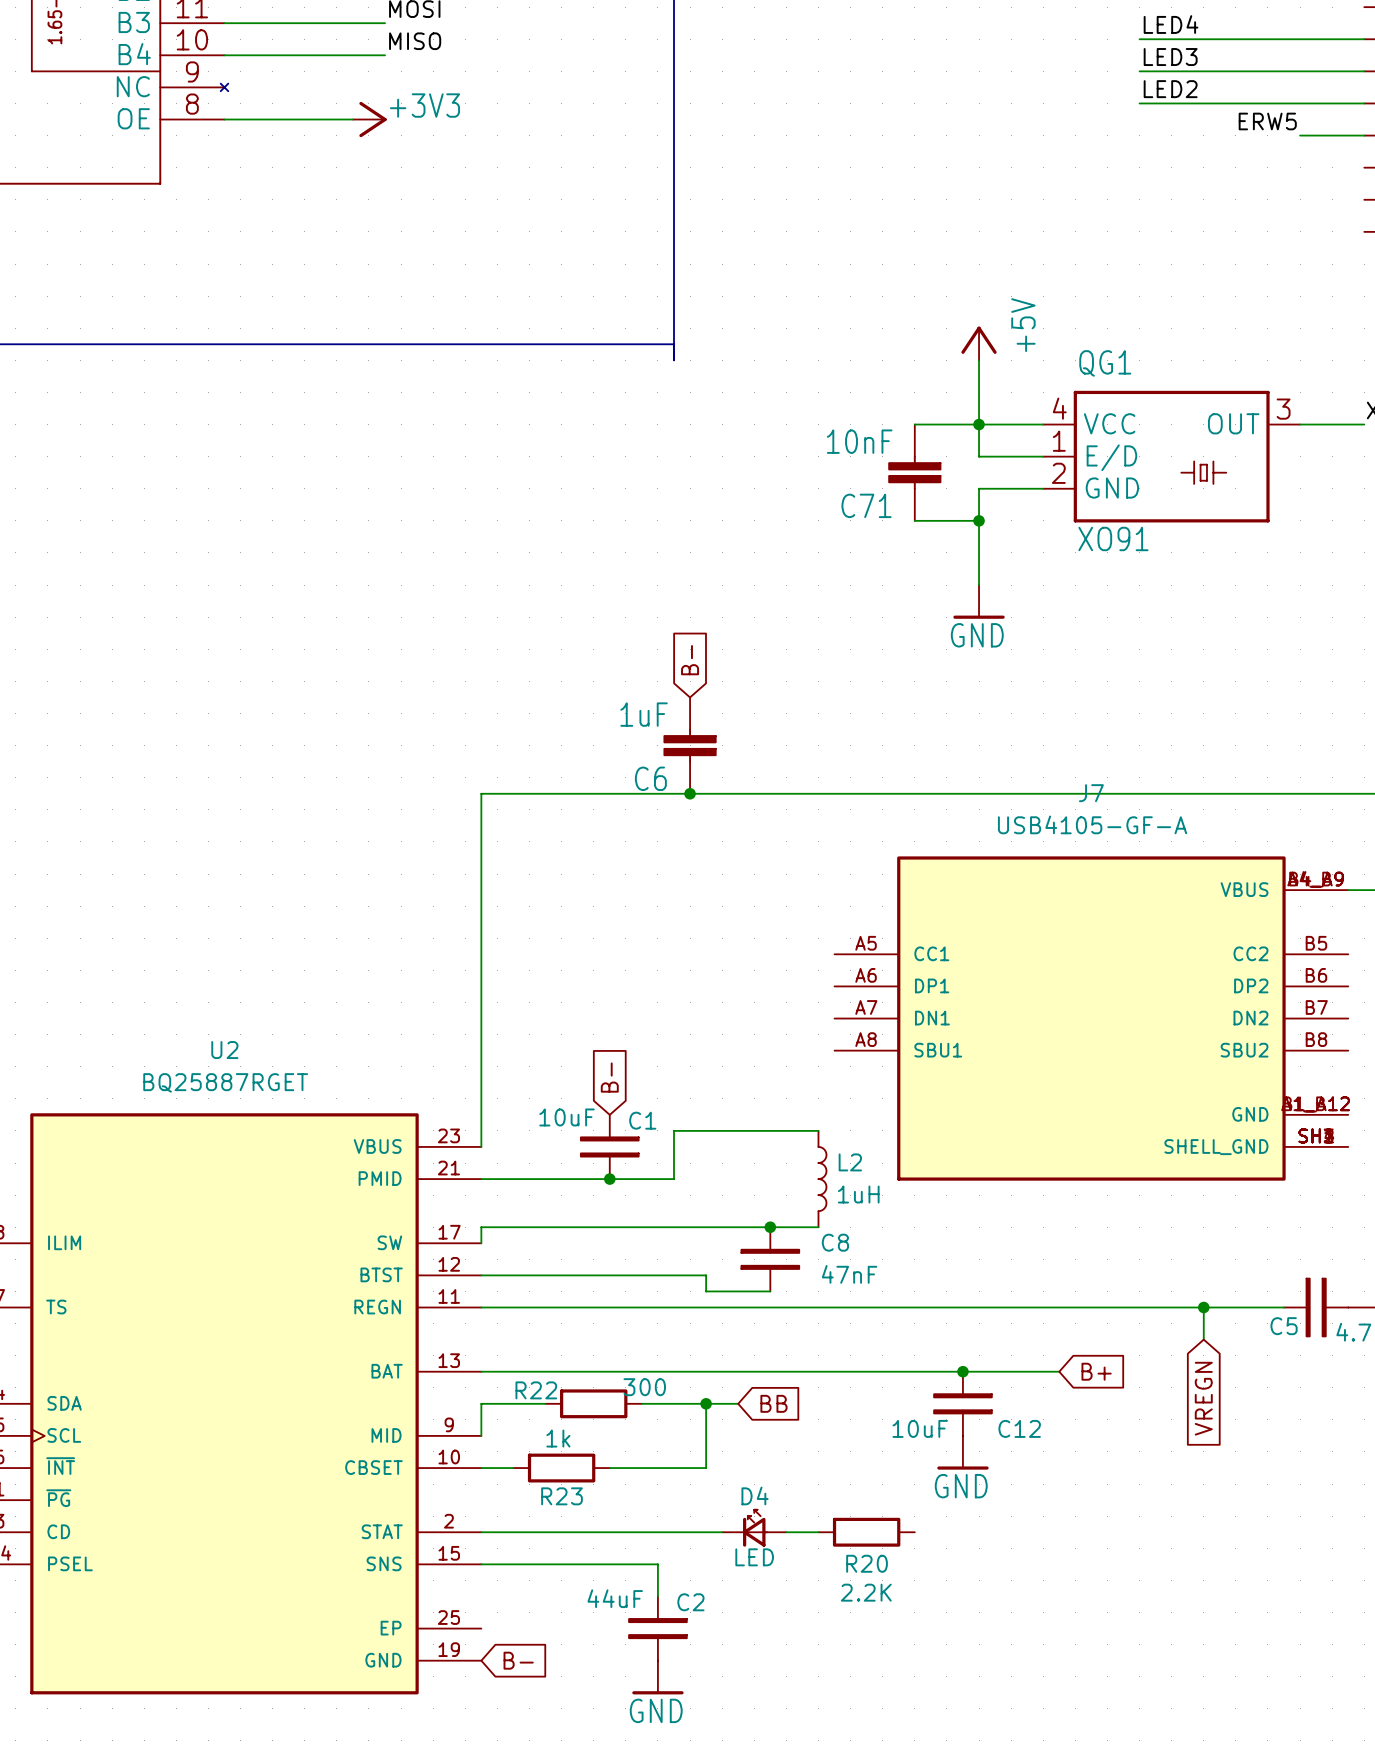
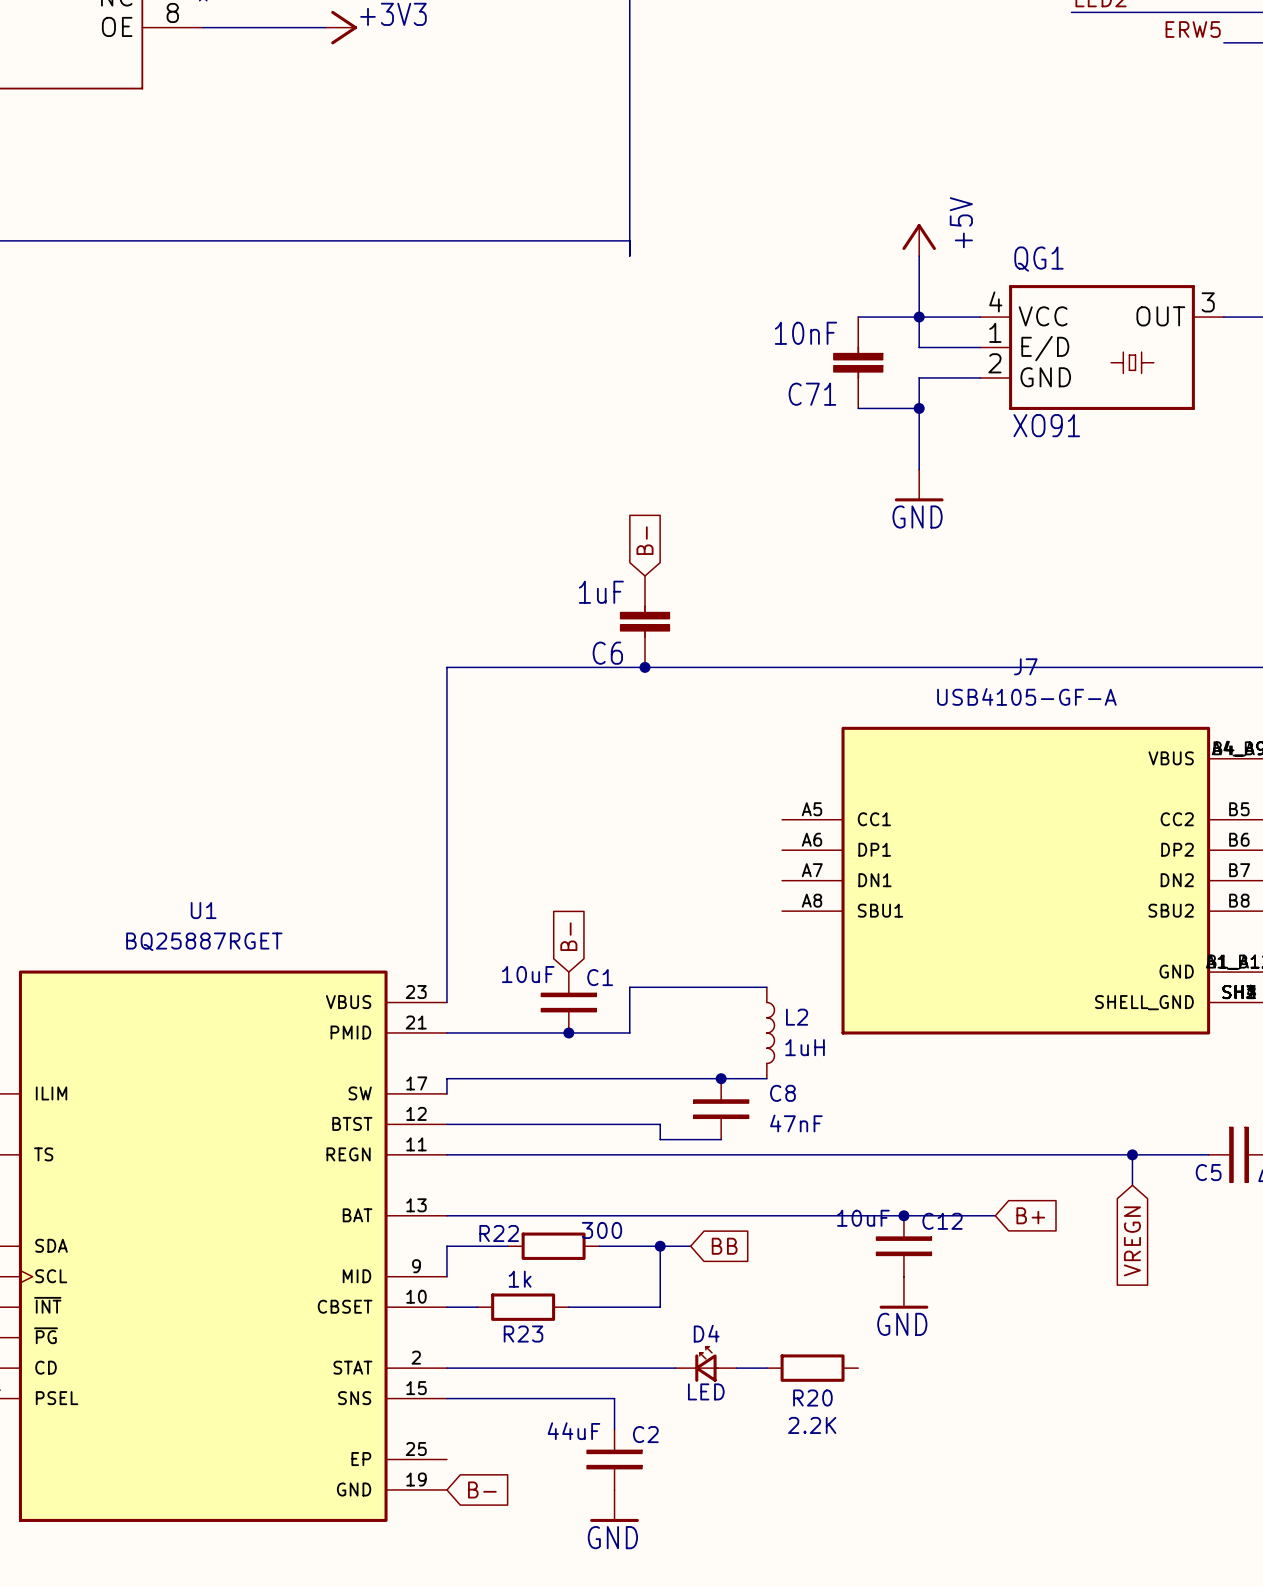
U2 name: U2 (224, 1050) -> U1 (203, 910)
C12 value position: 10uF (920, 1428) -> 10uF (863, 1218)
C12 name position: C12 (1019, 1428) -> C12 (942, 1221)

